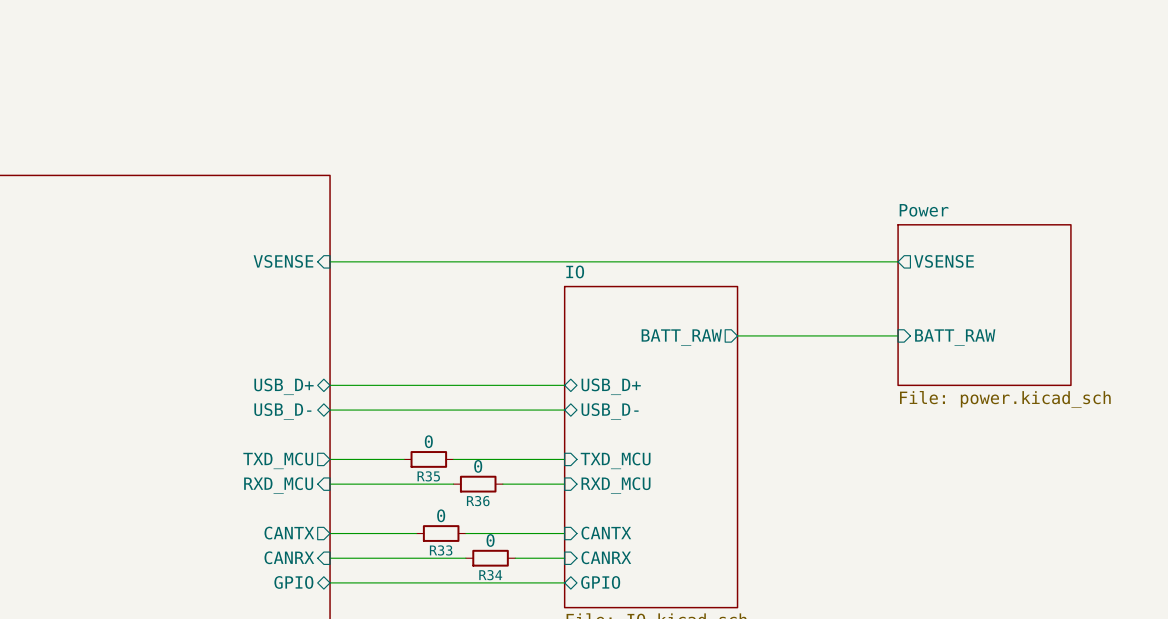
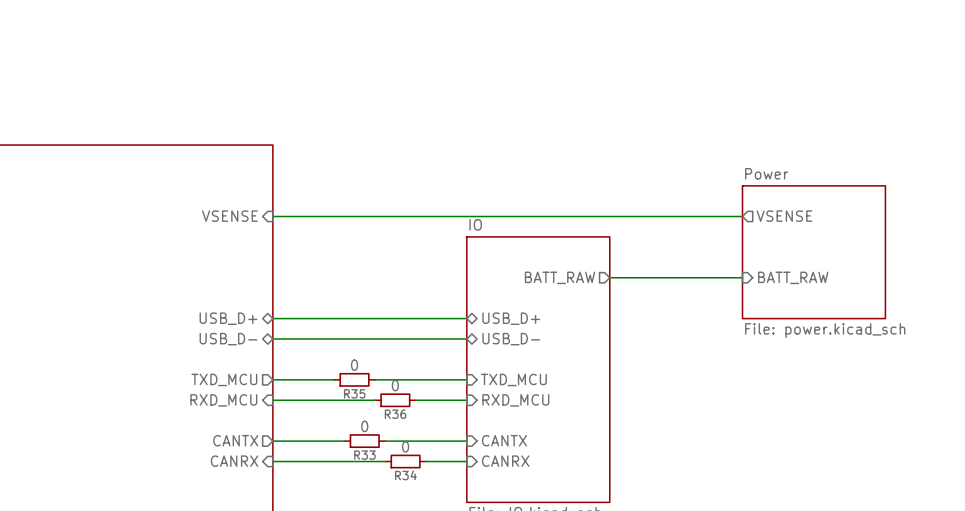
sheet pin: GPIO (293, 582) -> none
wire: (330, 582) (564, 582) -> none
sheet pin: GPIO (600, 582) -> none

